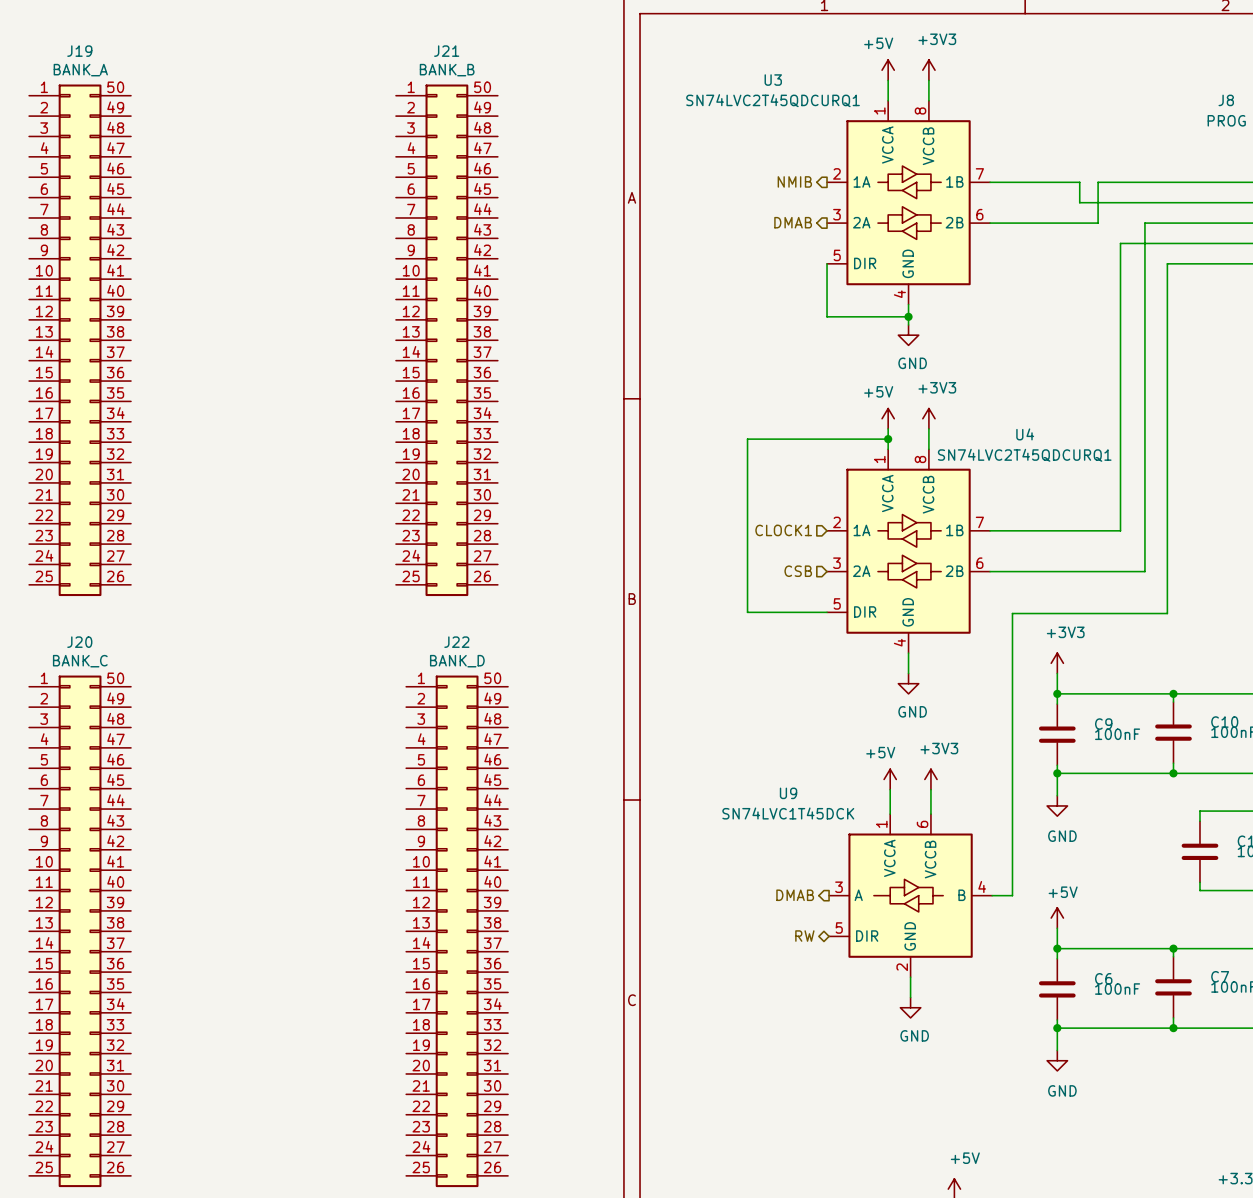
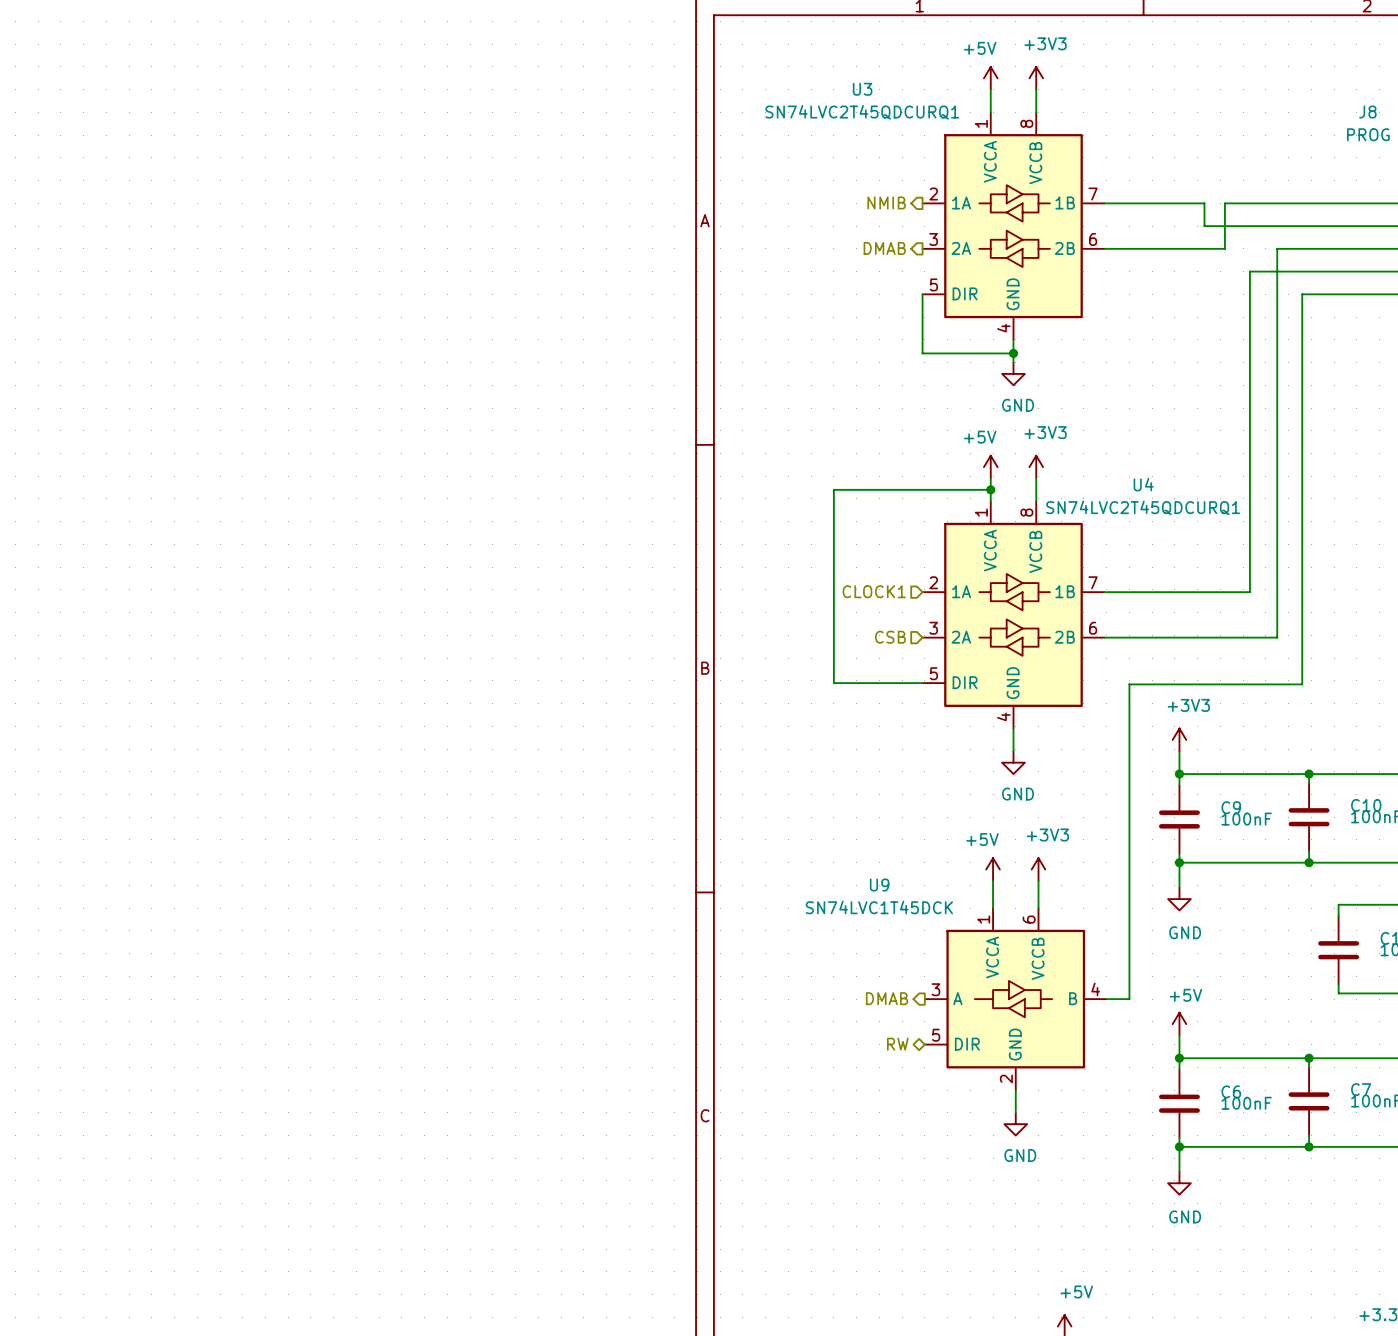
J19: BANK_A (80, 340) -> none
J21: BANK_B (446, 340) -> none
J20: BANK_C (80, 931) -> none
J22: BANK_D (457, 931) -> none

